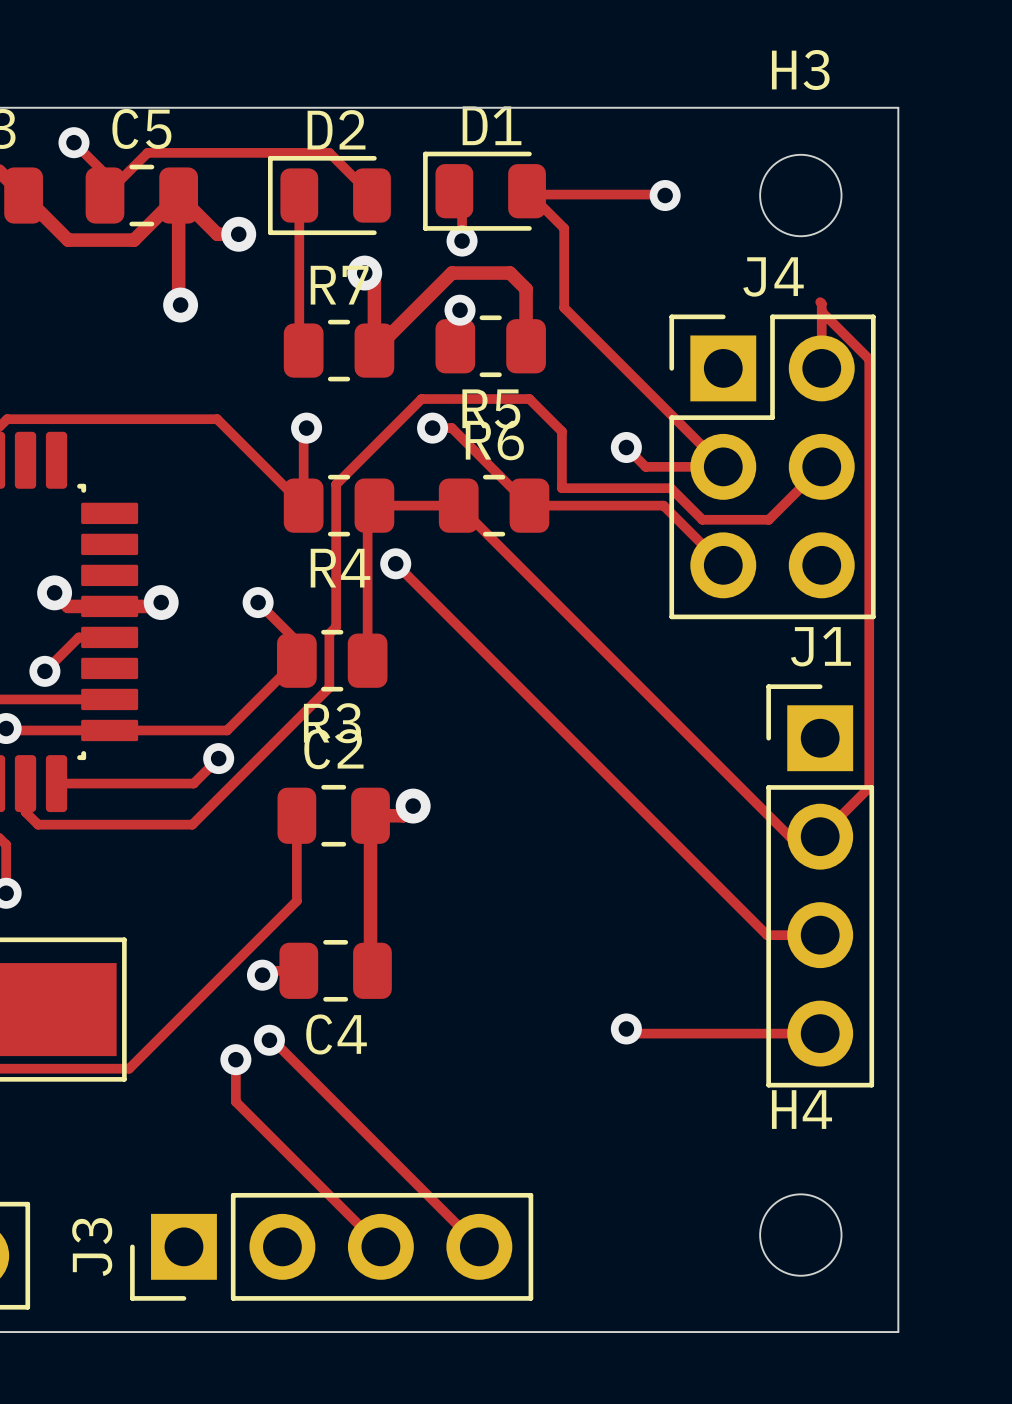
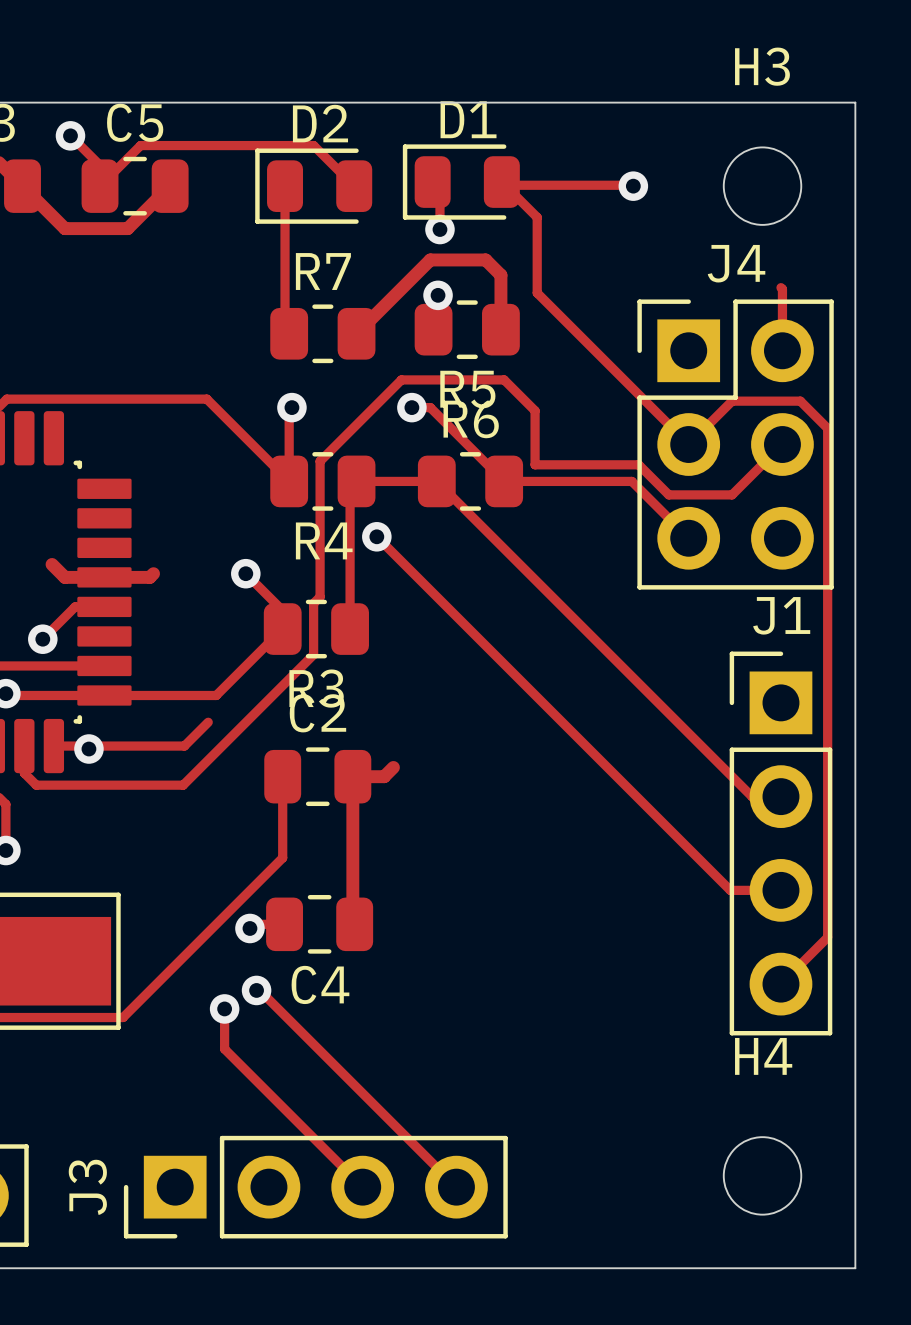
track: (238, 234) (217, 234) (178, 195) (178, 303) (180, 305) -> none
via: (238, 234) -> none
track: (364, 273) (374, 282) (374, 350) -> none
via: (364, 273) -> none
via: (180, 305) -> none
track: (821, 311) (869, 359) (869, 449) -> (688, 444) (732, 401) (800, 401) (827, 428)
track: (626, 447) (645, 466) (723, 466) -> none
via: (626, 447) -> none
via: (54, 592) -> none
via: (161, 602) -> none
via: (218, 758) -> none
via: none -> (88, 749)
track: (869, 787) (820, 836) -> (827, 749) (827, 937) (780, 984)
via: (413, 806) -> none
track: (626, 1028) (631, 1033) (820, 1033) -> none
via: (626, 1028) -> none

